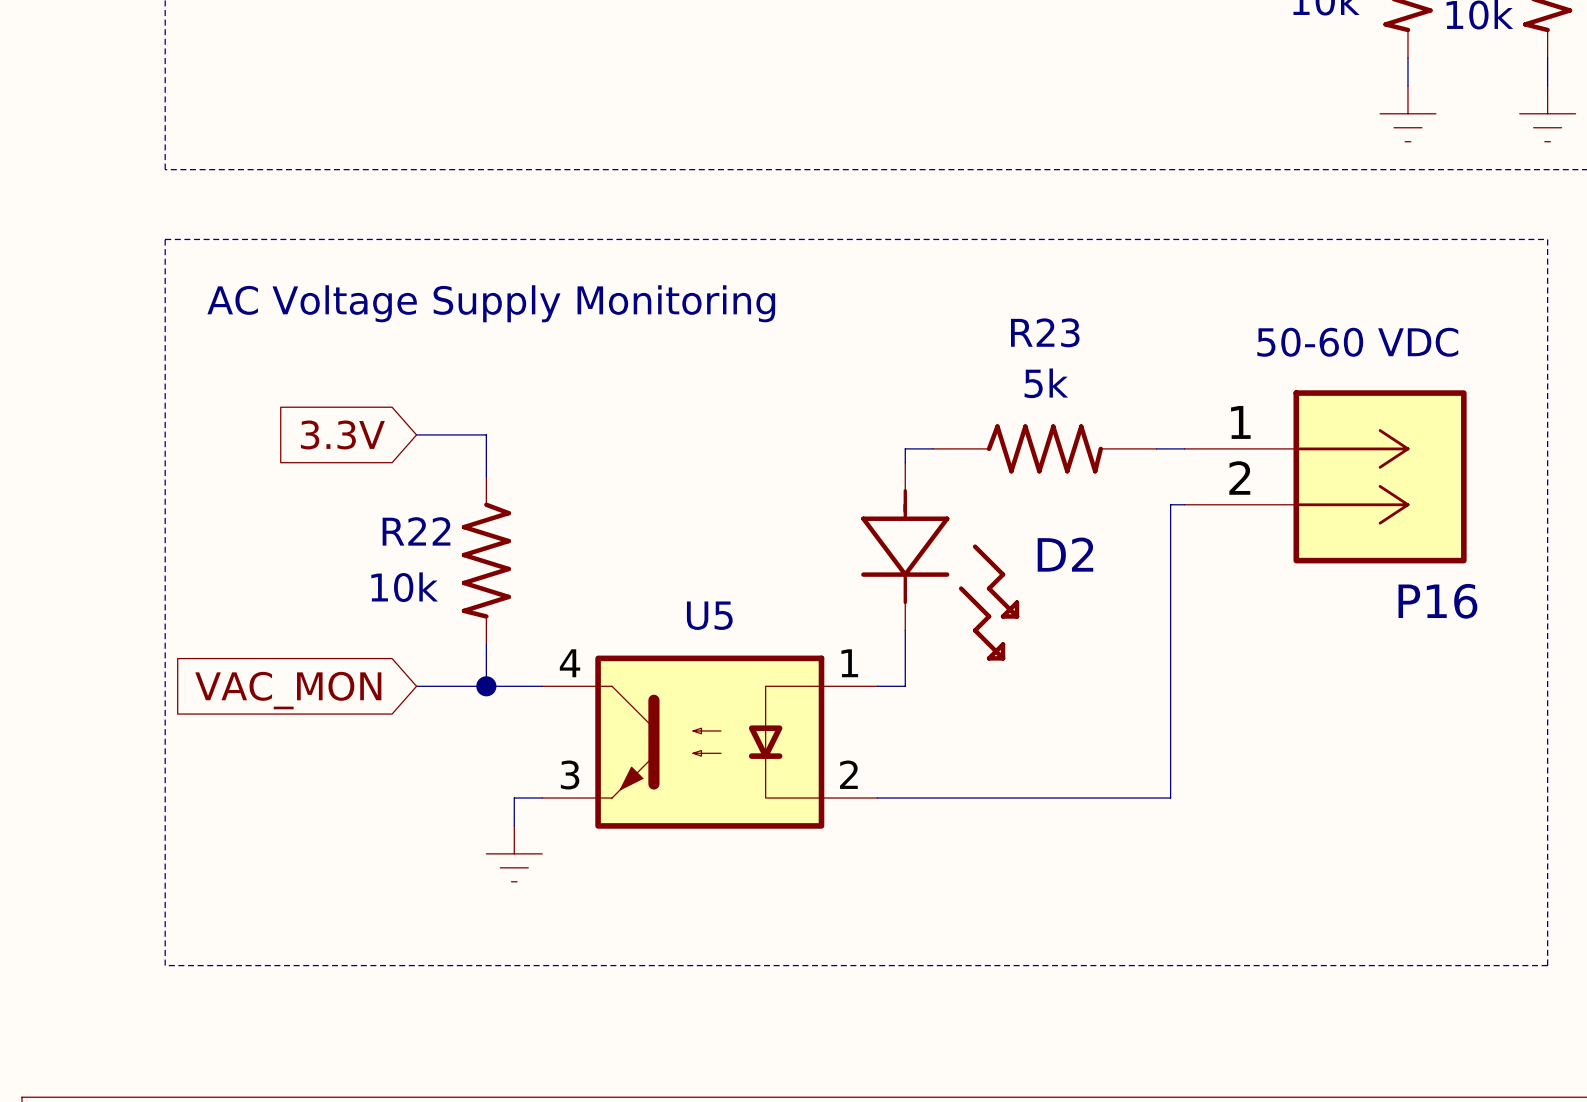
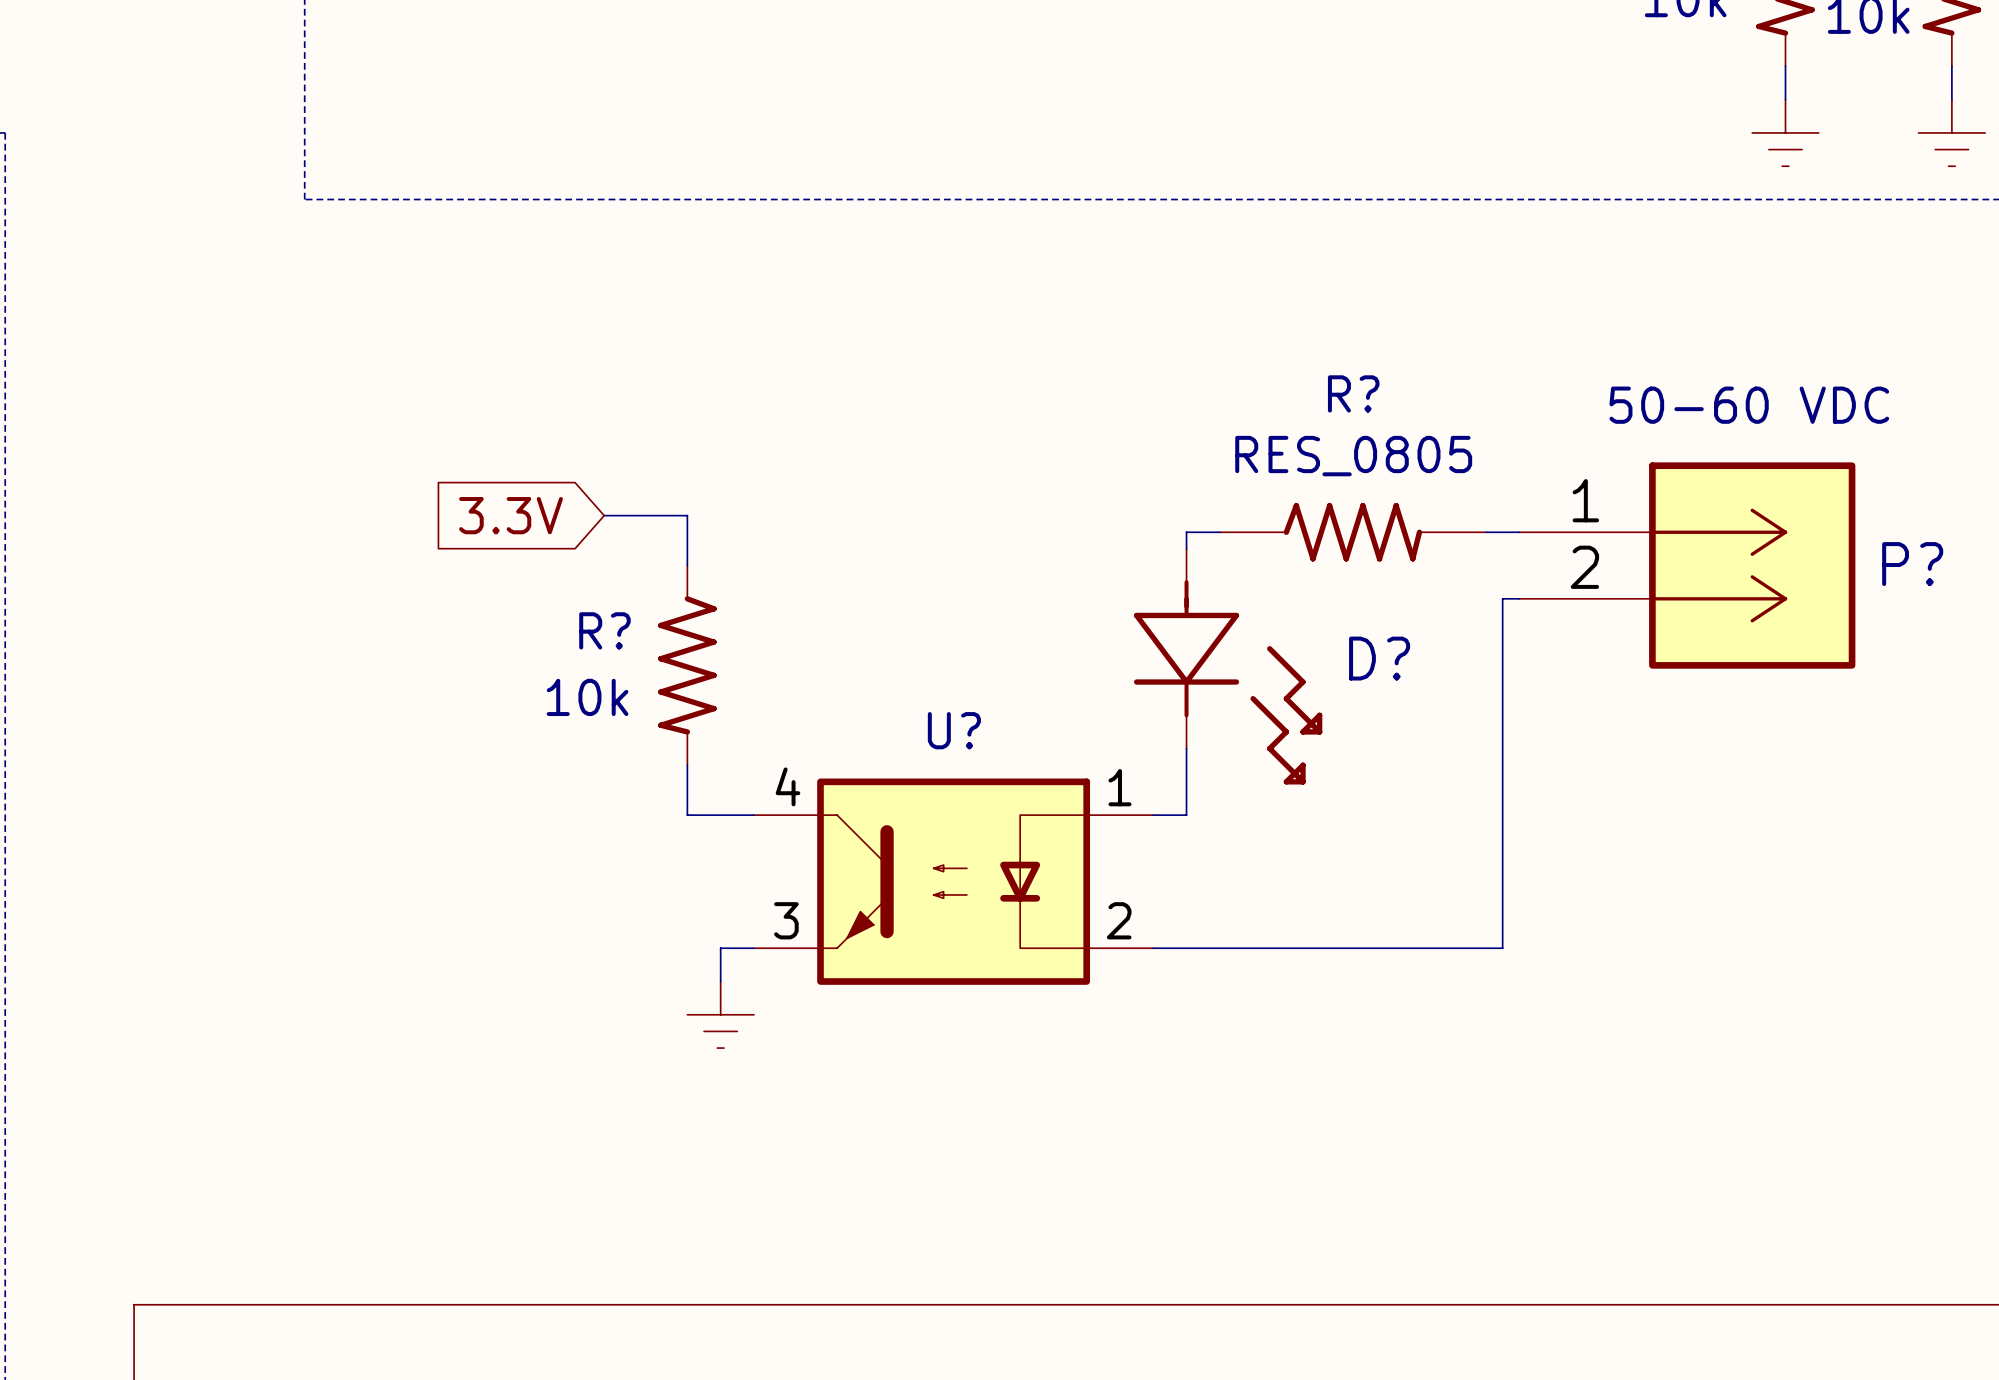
line: (165, 239) (165, 965) (1547, 965) (1547, 239) (165, 239) -> none
text: AC Voltage Supply Monitoring (491, 303) -> none
R23 name: R23 (1045, 332) -> R? (1353, 393)
R23 value: 5k (1046, 383) -> RES_0805 (1353, 456)
R22 name: R22 (416, 531) -> R? (604, 630)
D2 name: D2 (1065, 554) -> D? (1379, 658)
P16 name: P16 (1437, 601) -> P? (1912, 564)
U5 name: U5 (709, 615) -> U? (954, 730)
wire: (416, 686) (486, 686) -> none
junction: (486, 686) -> none
global label: VAC_MON (288, 690) -> none

